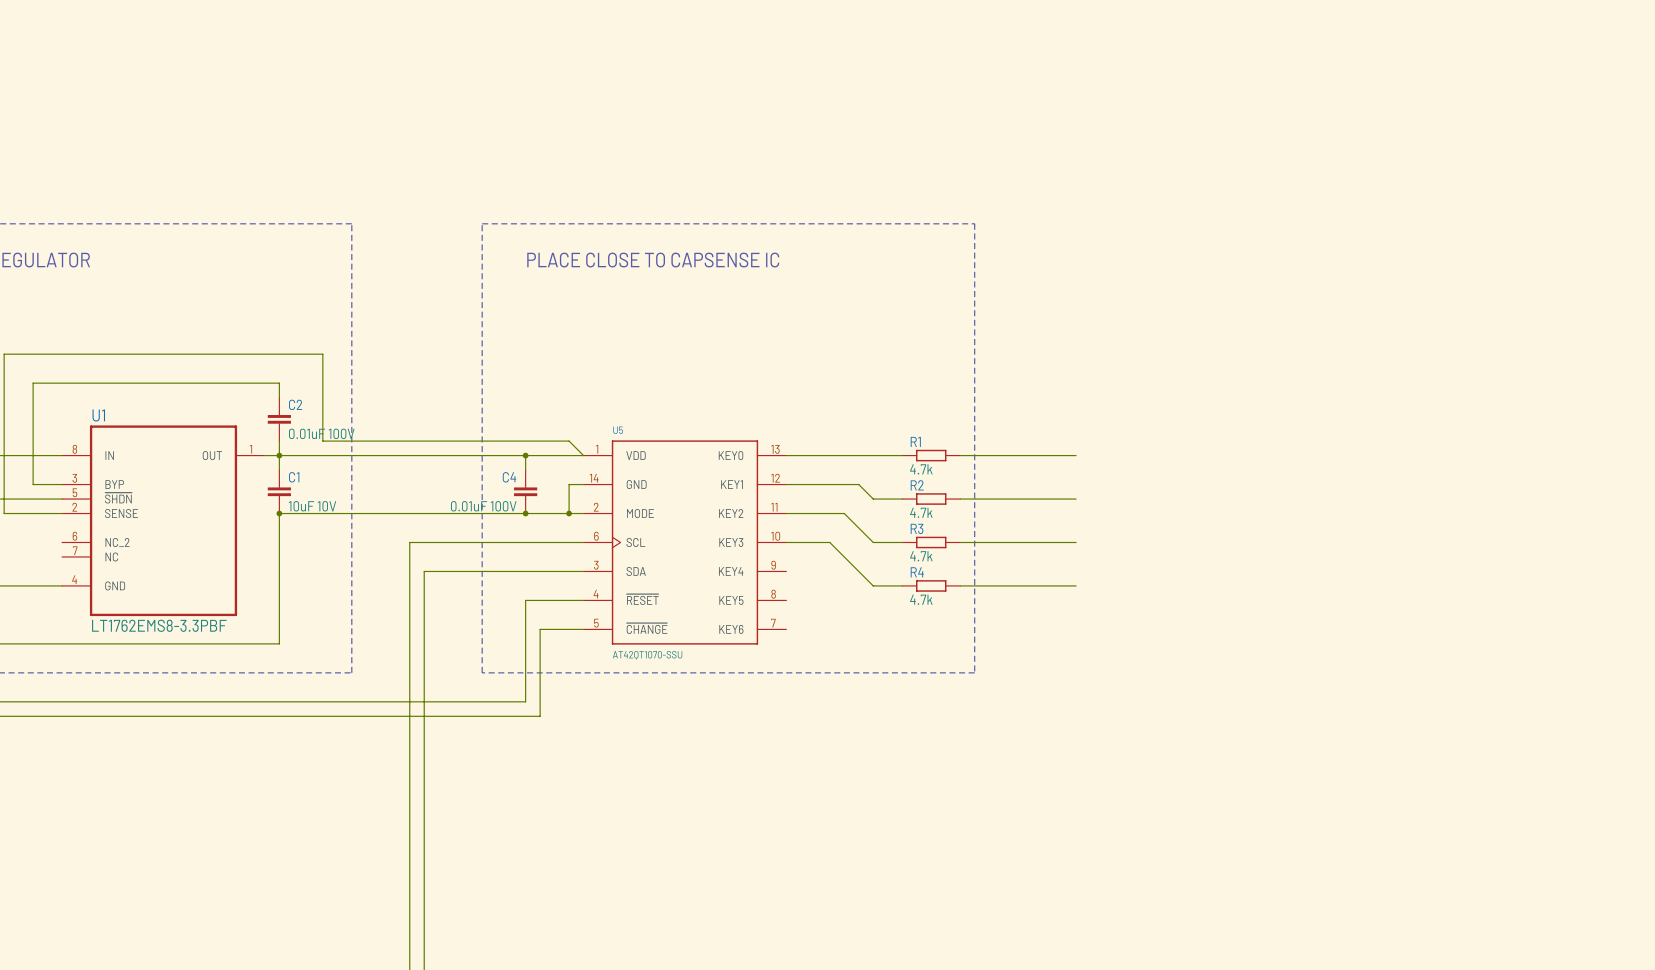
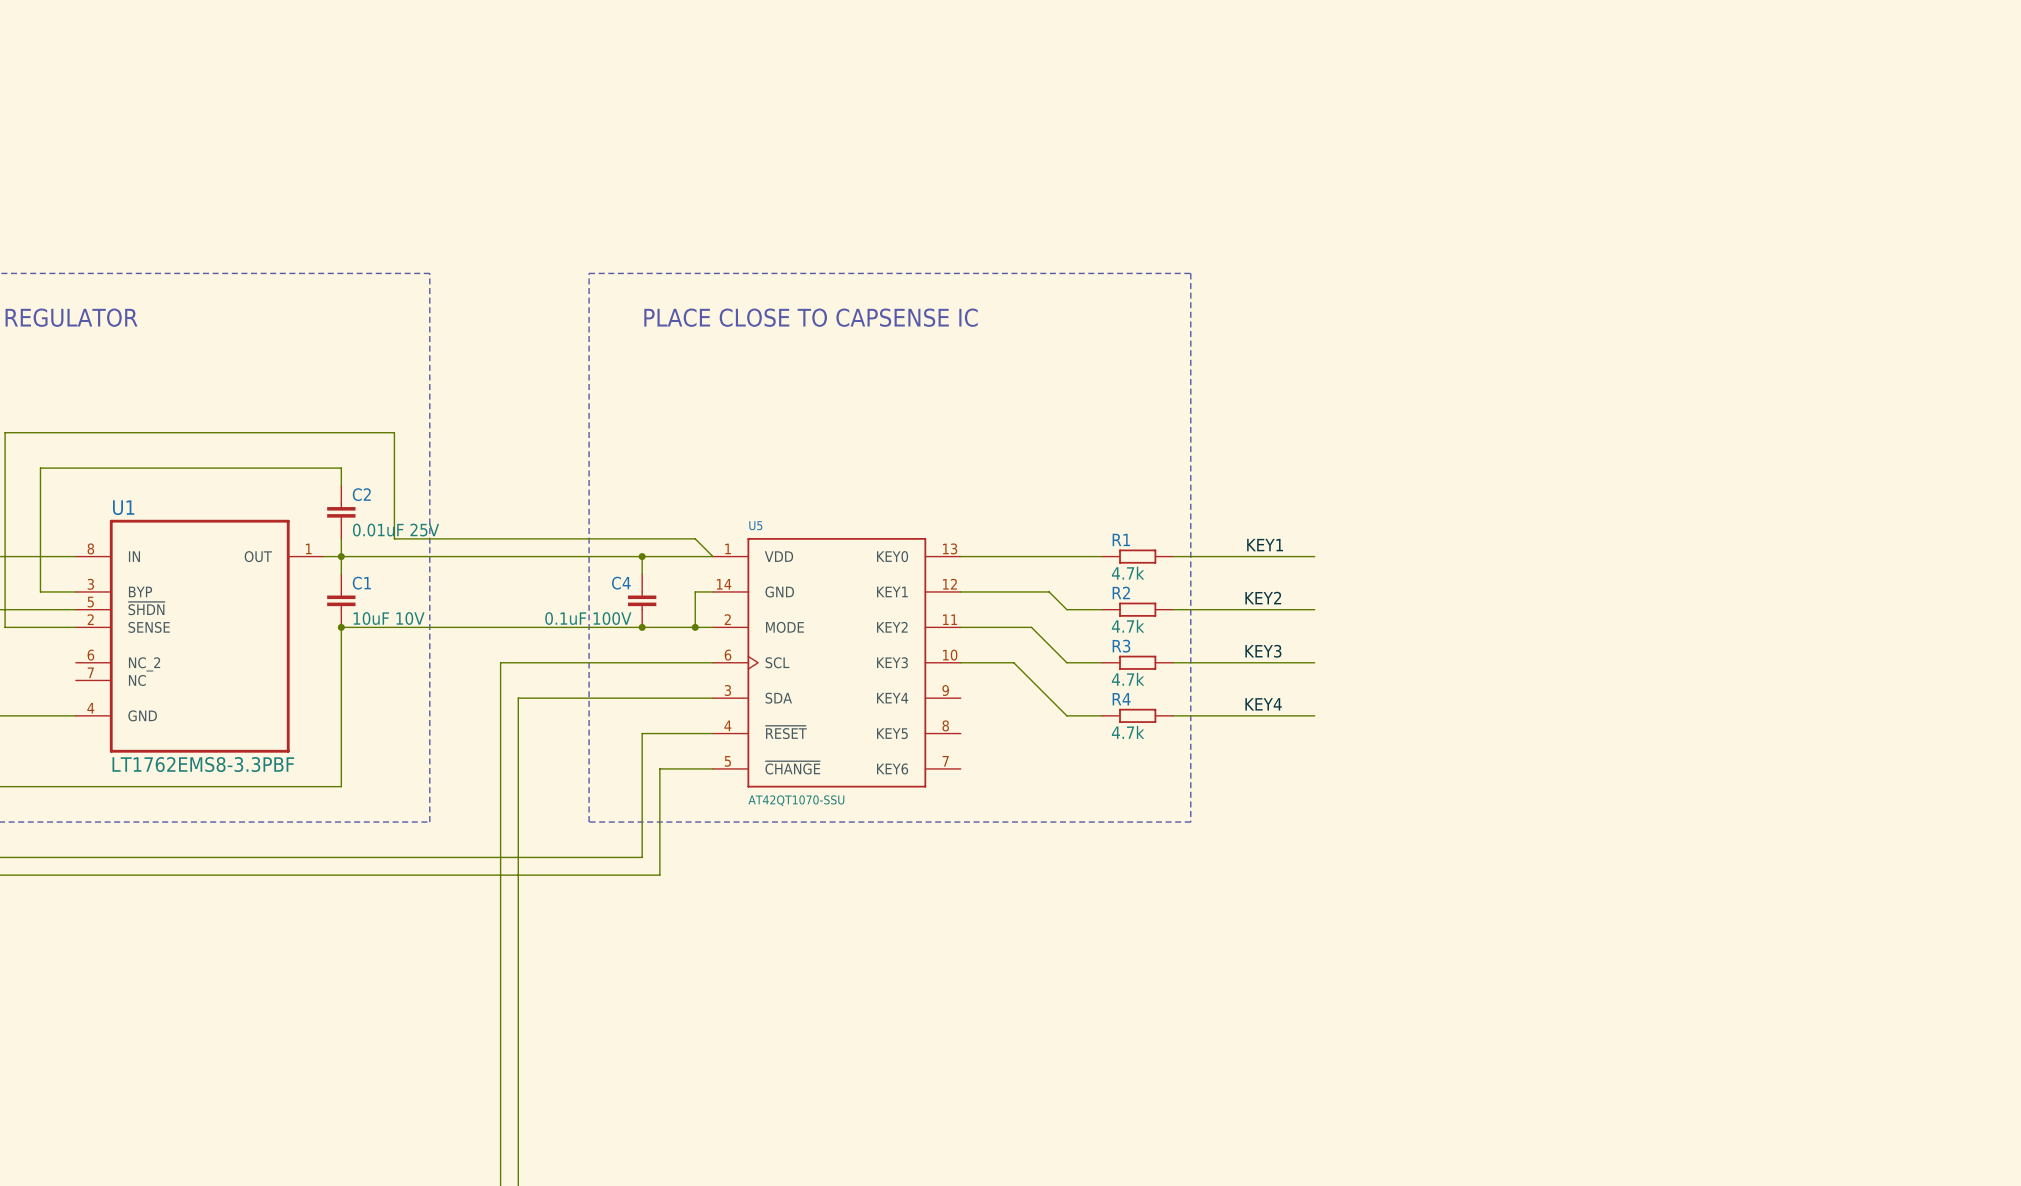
C2 value: 0.01uF 100V (321, 433) -> 0.01uF 25V (396, 530)
label: none -> KEY1 (1265, 545)
label: none -> KEY2 (1263, 598)
C4 value: 0.01uF 100V (483, 506) -> 0.1uF 100V (588, 618)
label: none -> KEY3 (1263, 651)
label: none -> KEY4 (1263, 704)

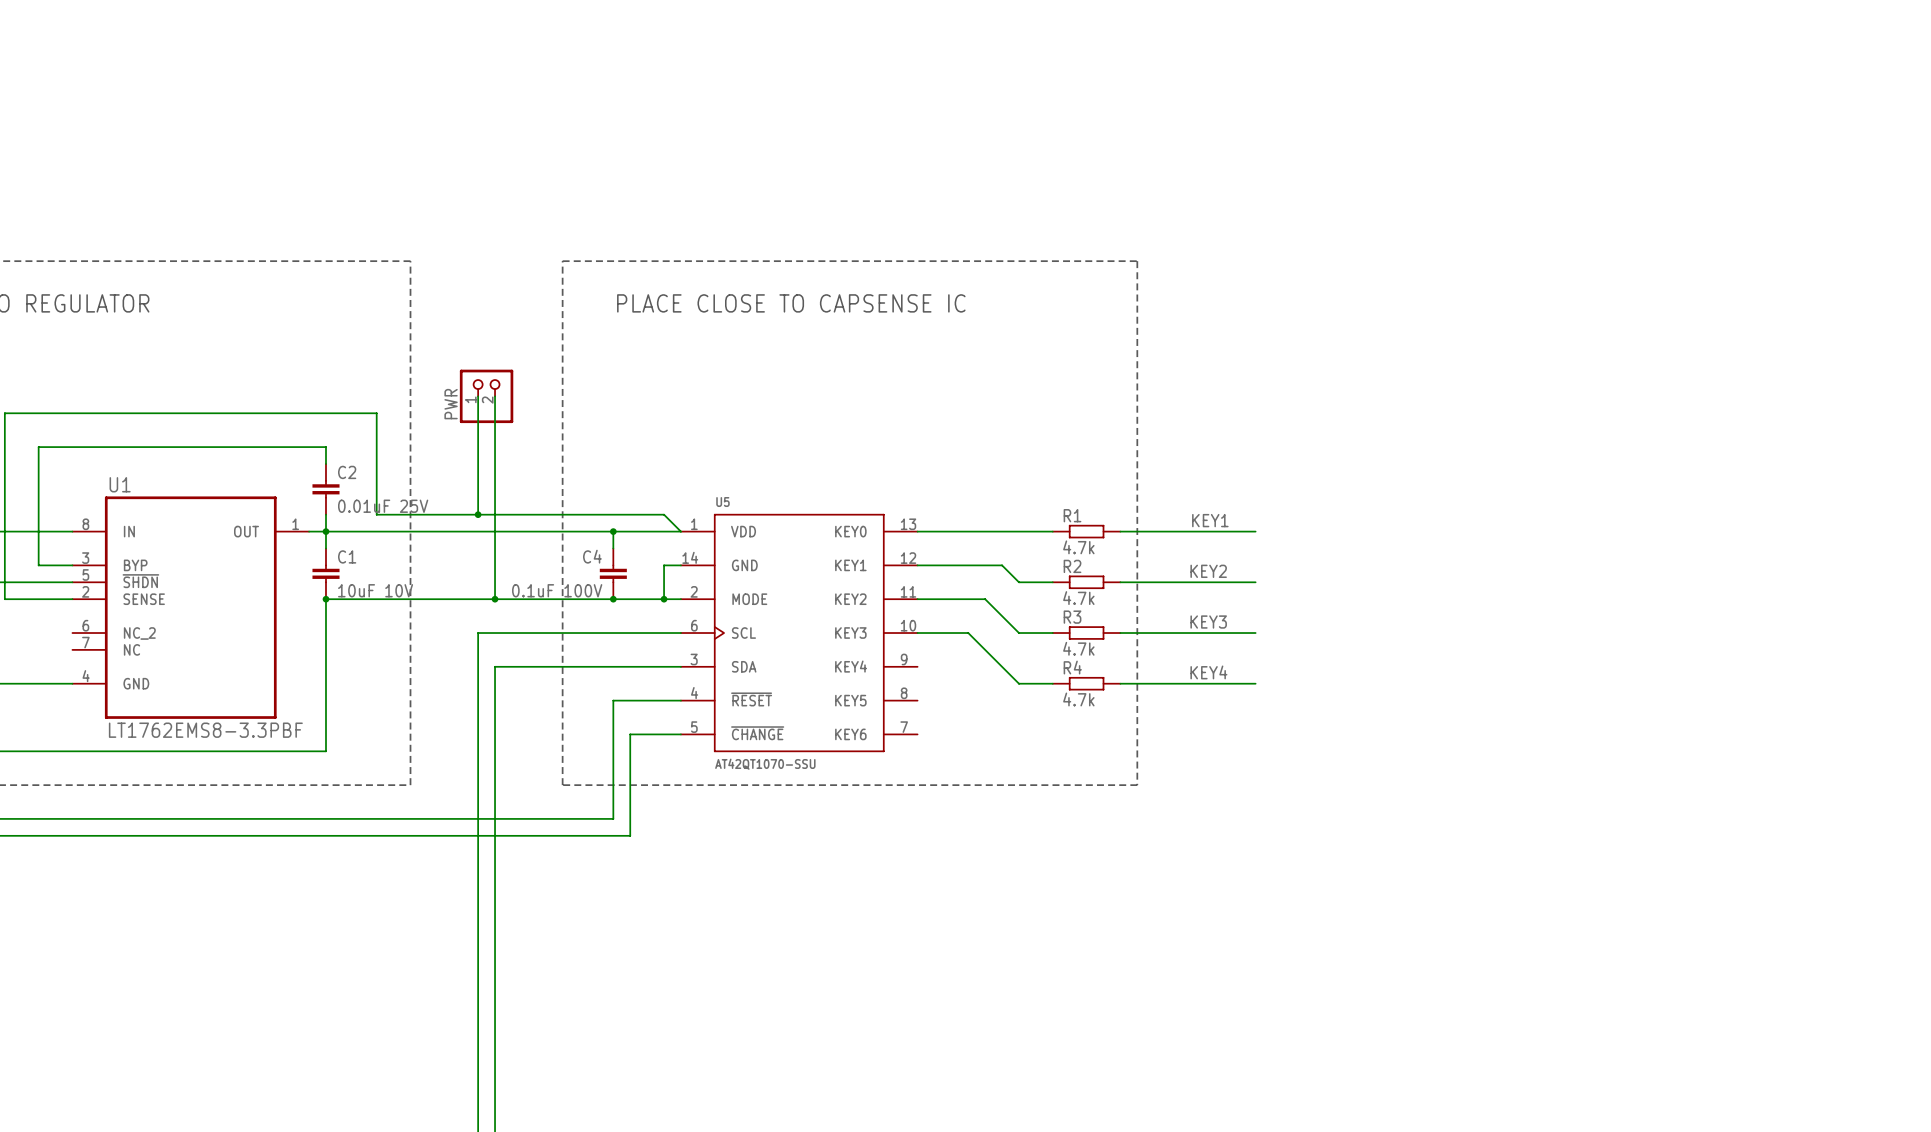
wire: none -> (478, 396) (478, 514)
PWR: none -> (486, 396)
wire: none -> (495, 396) (495, 599)
junction: none -> (478, 514)
junction: none -> (495, 599)

